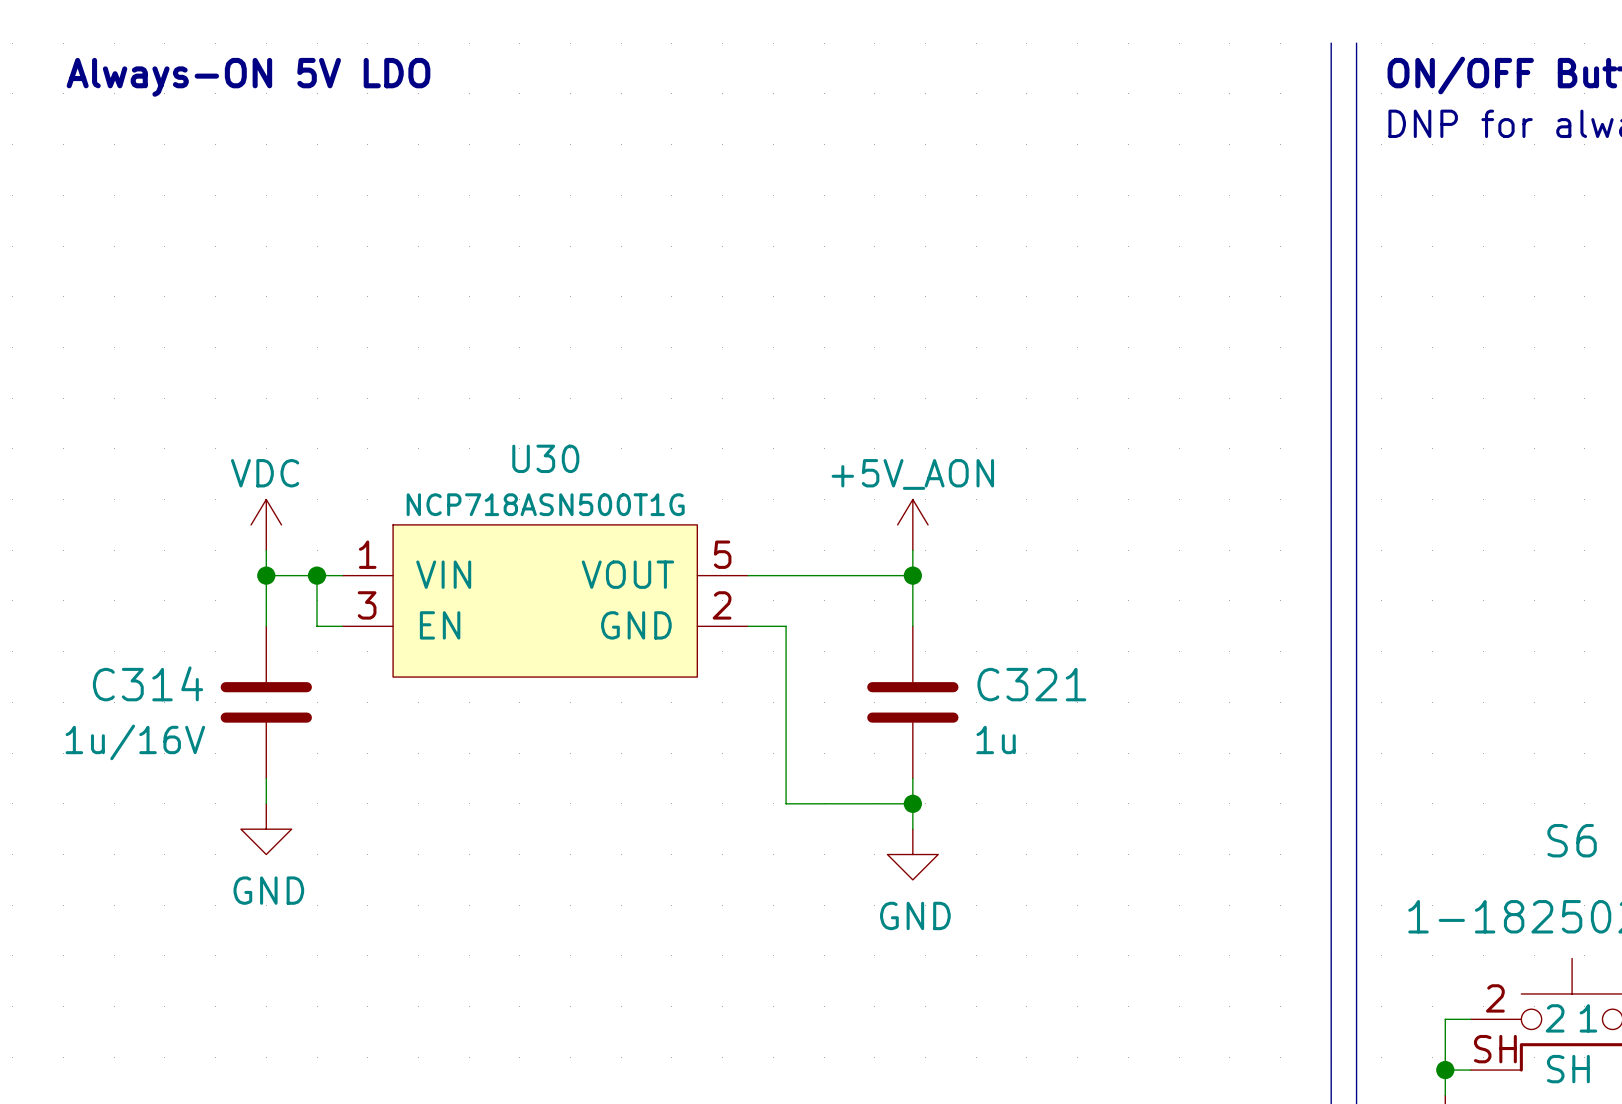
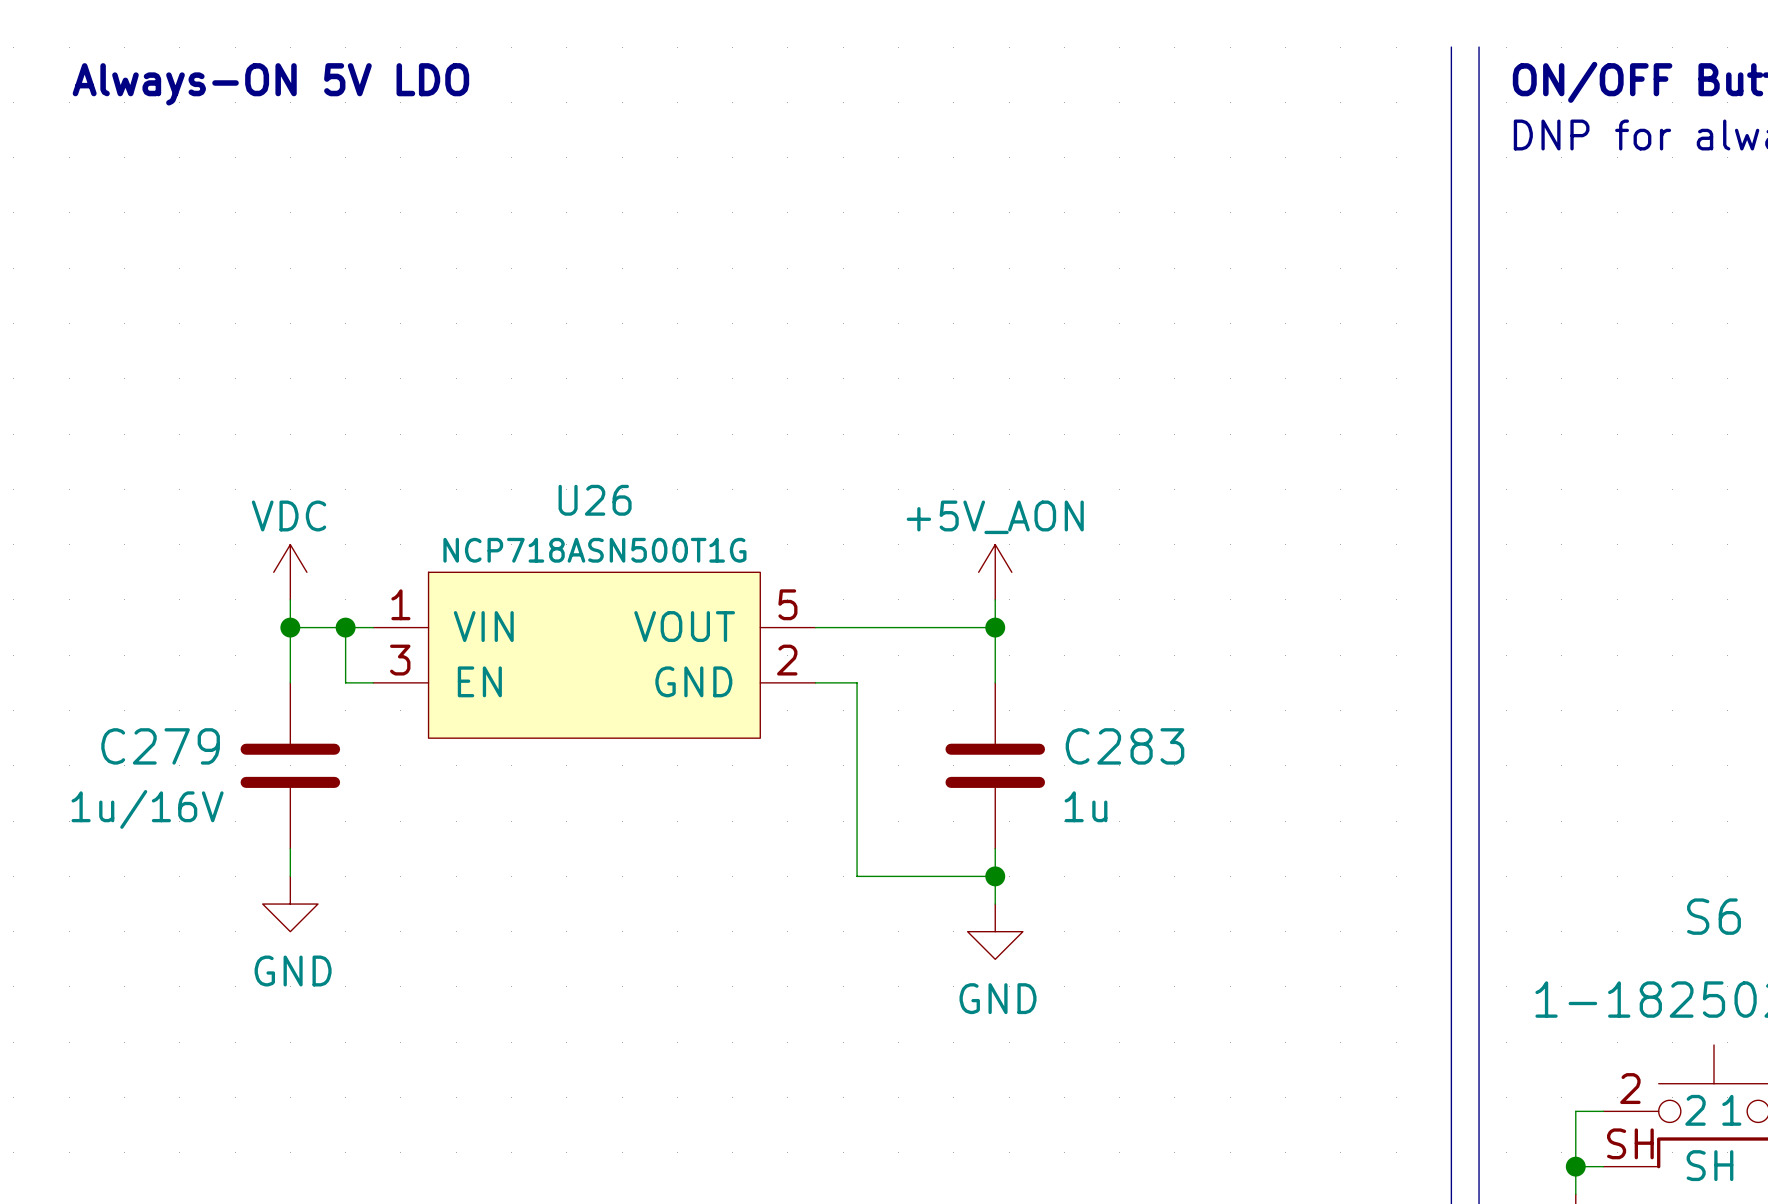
U30 name: U30 (545, 458) -> U26 (595, 500)
C314 name: C314 (148, 683) -> C279 (160, 746)
C321 name: C321 (1031, 684) -> C283 (1124, 746)

